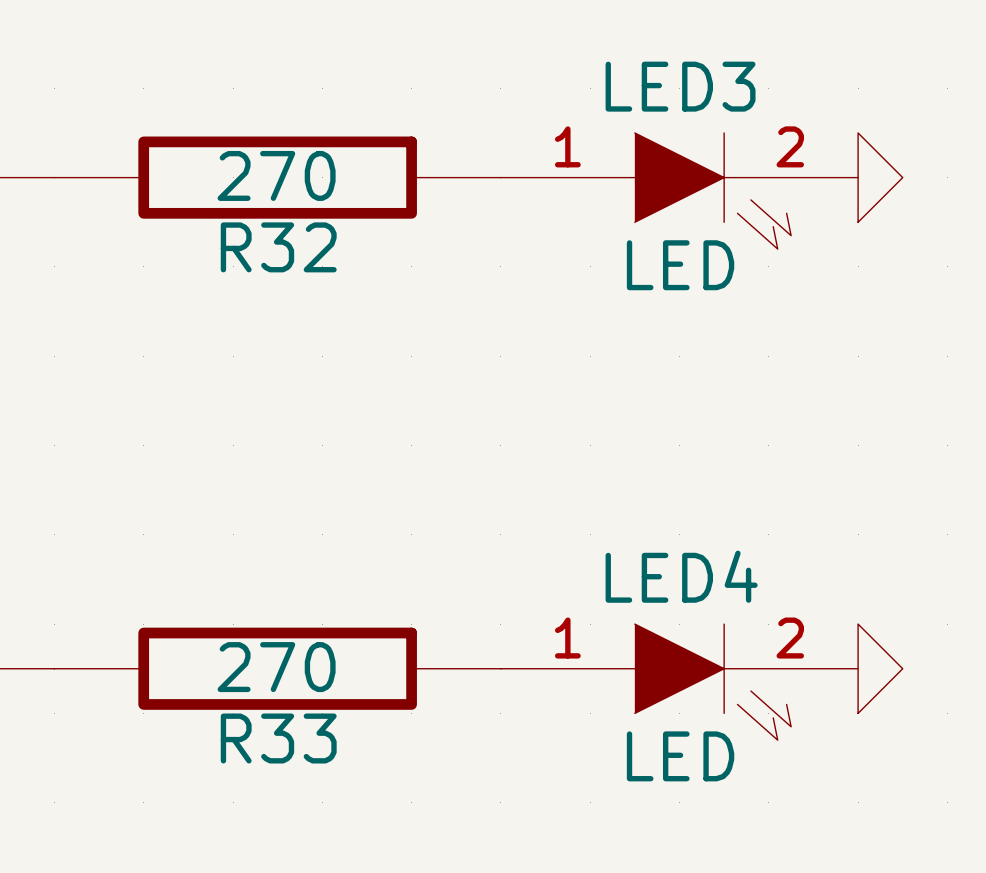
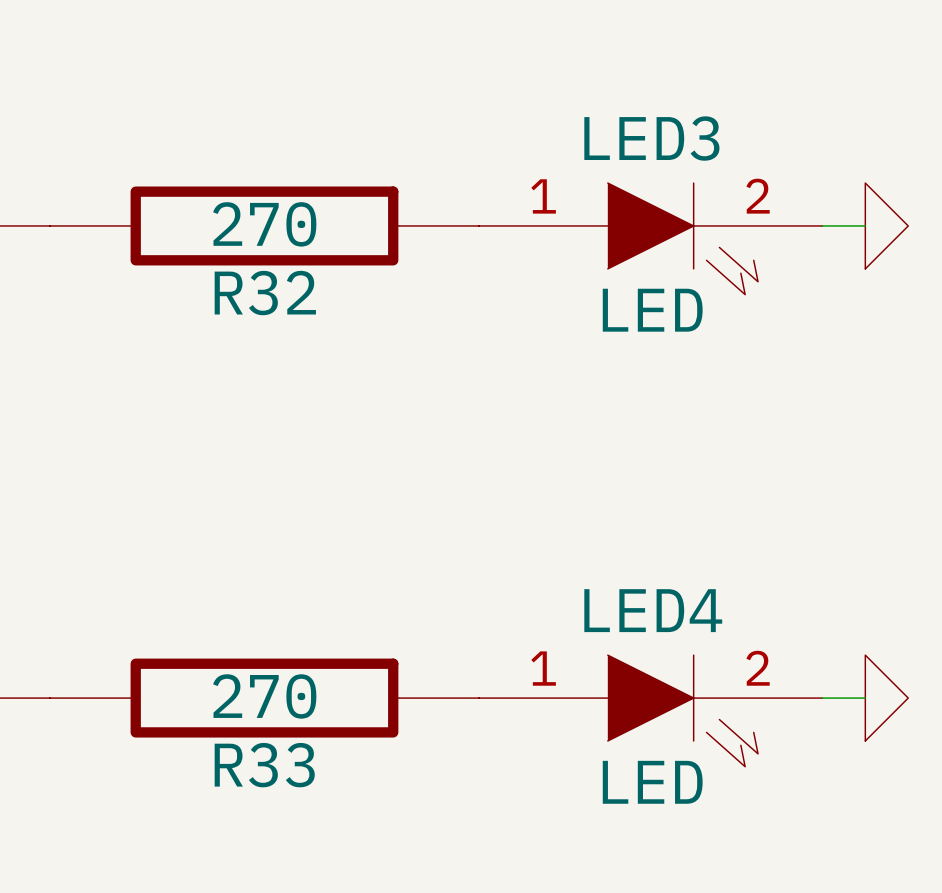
wire: none -> (822, 225) (865, 225)
power symbol position: (880, 177) -> (886, 225)
wire: none -> (822, 698) (865, 698)
power symbol position: (880, 668) -> (886, 698)

